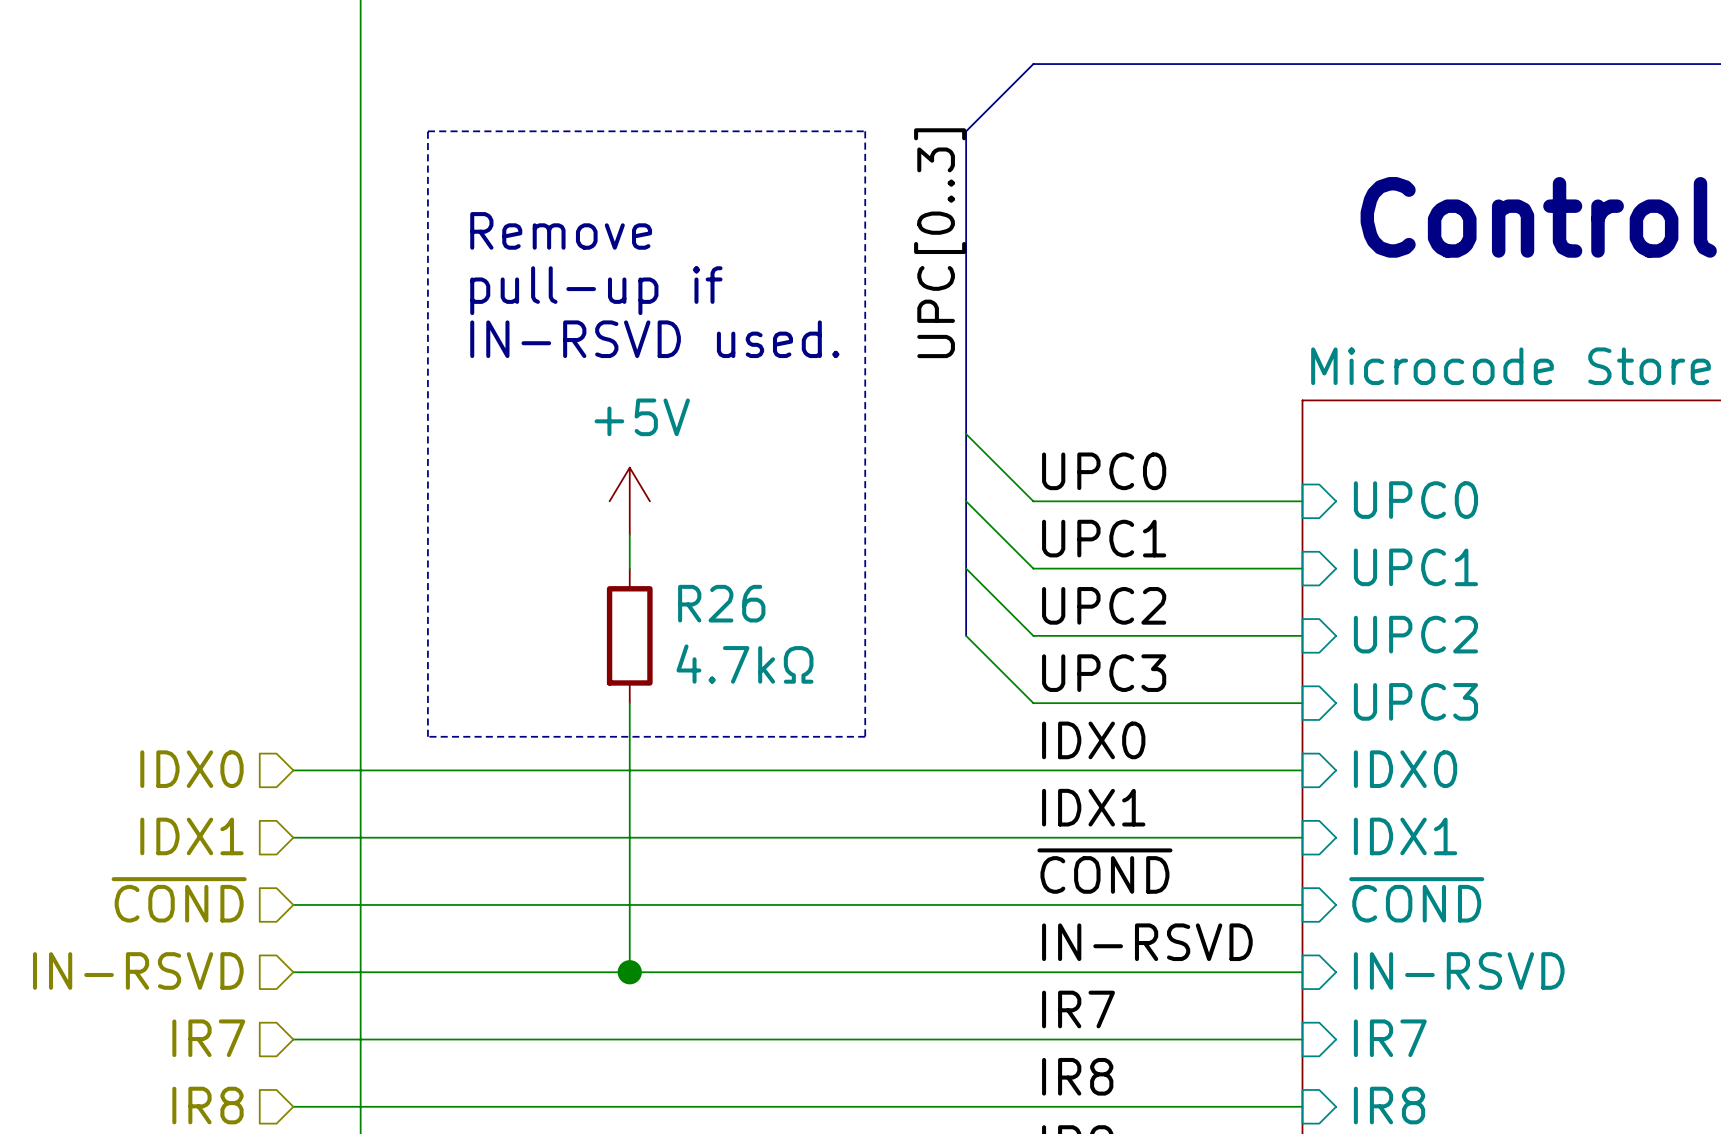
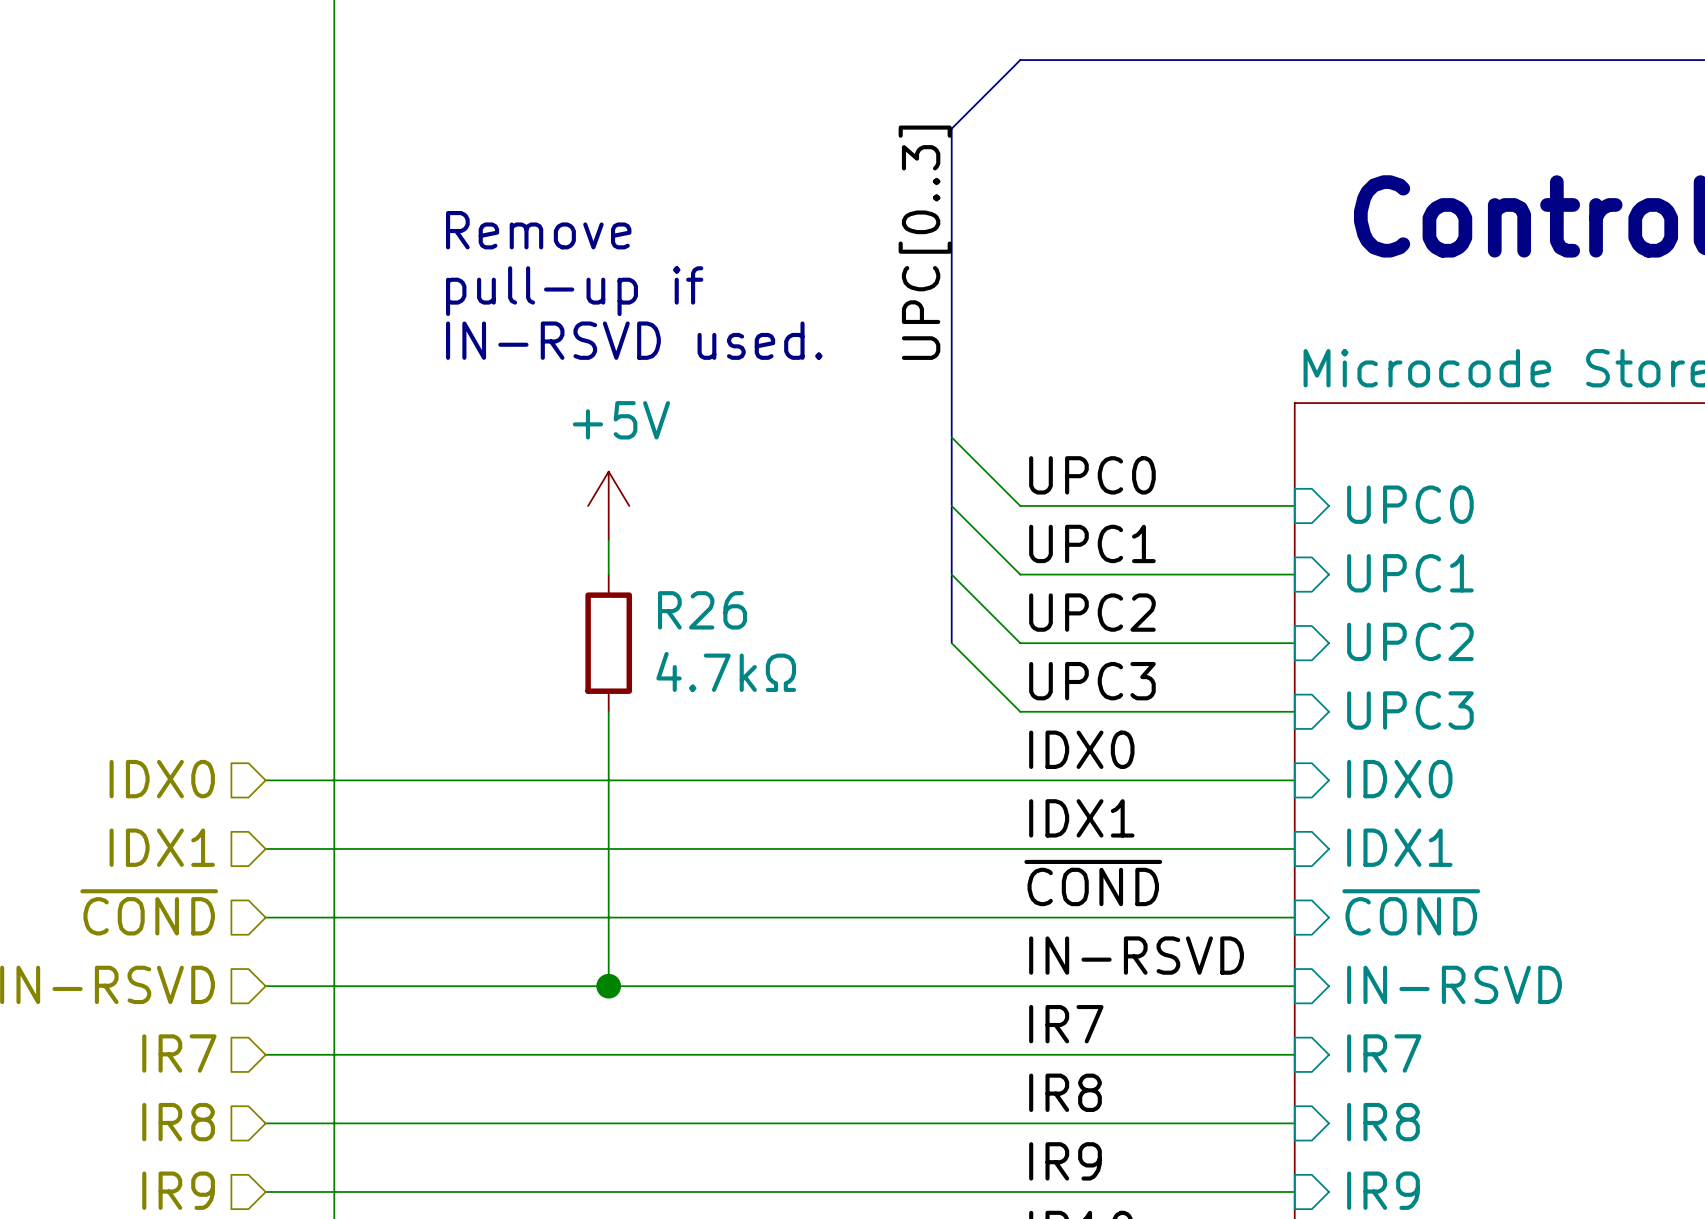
line: (427, 131) (865, 131) (865, 736) (427, 736) (427, 131) -> none

